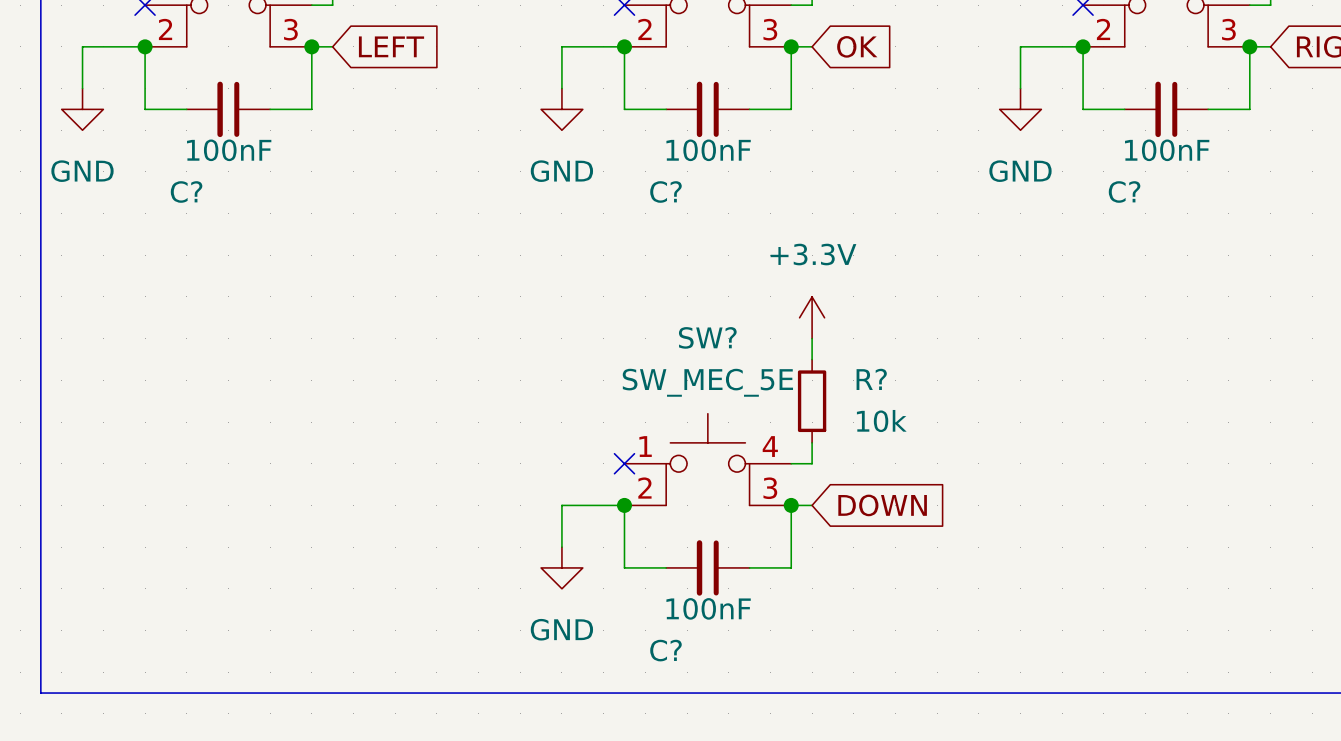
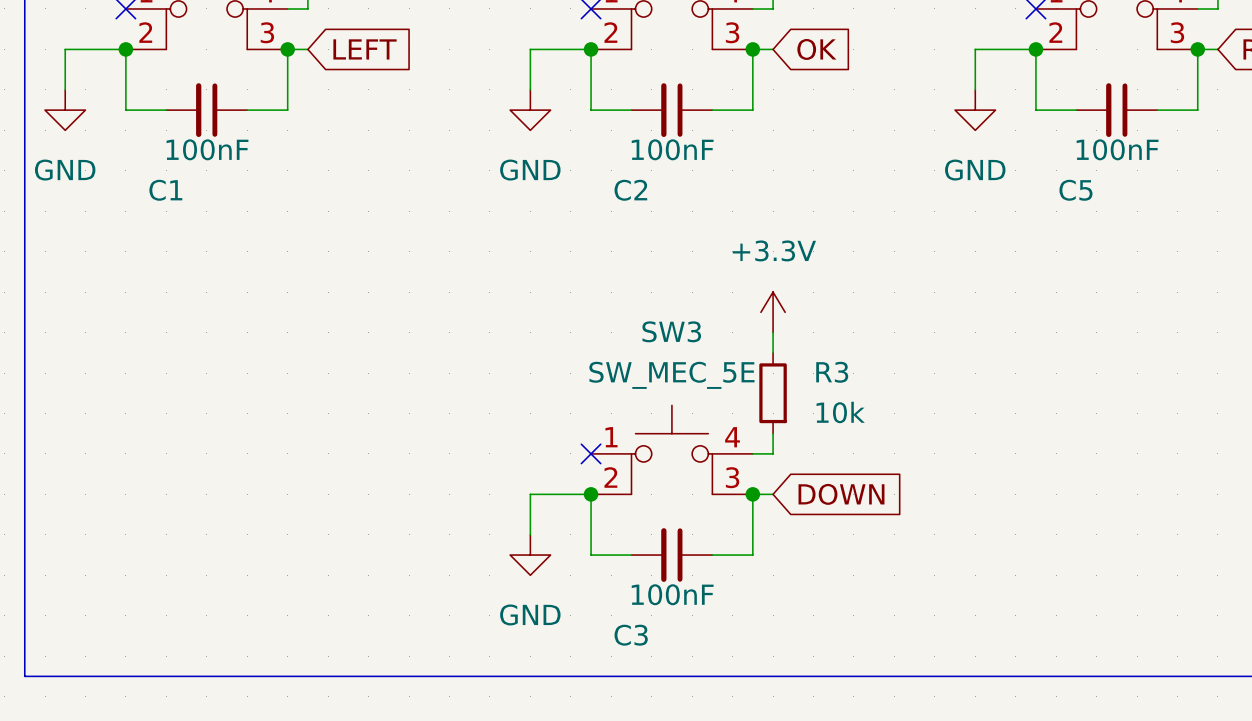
C? name: C? (186, 191) -> C1 (165, 190)
C? name: C? (665, 191) -> C2 (630, 190)
C? name: C? (1124, 191) -> C5 (1075, 190)
SW? name: SW? (707, 337) -> SW3 (671, 331)
R? name: R? (871, 379) -> R3 (832, 372)
C? name: C? (665, 650) -> C3 (631, 635)

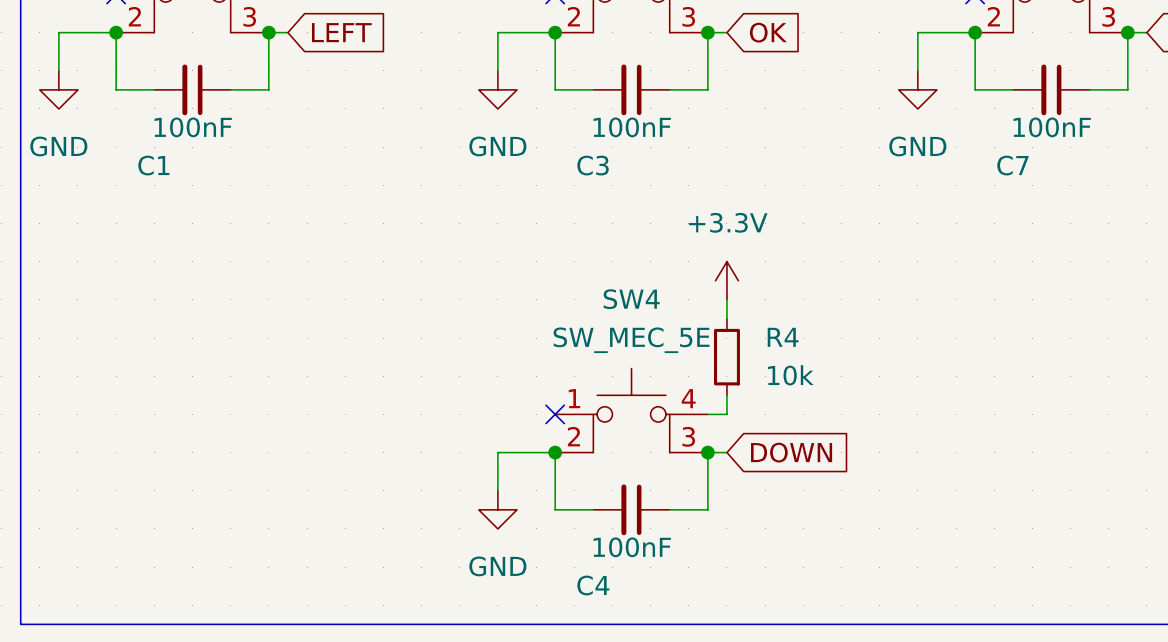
C2 name: C2 (630, 190) -> C3 (593, 165)
C5 name: C5 (1075, 190) -> C7 (1012, 165)
SW3 name: SW3 (671, 331) -> SW4 (631, 299)
R3 name: R3 (832, 372) -> R4 (783, 337)
C3 name: C3 (631, 635) -> C4 (593, 585)

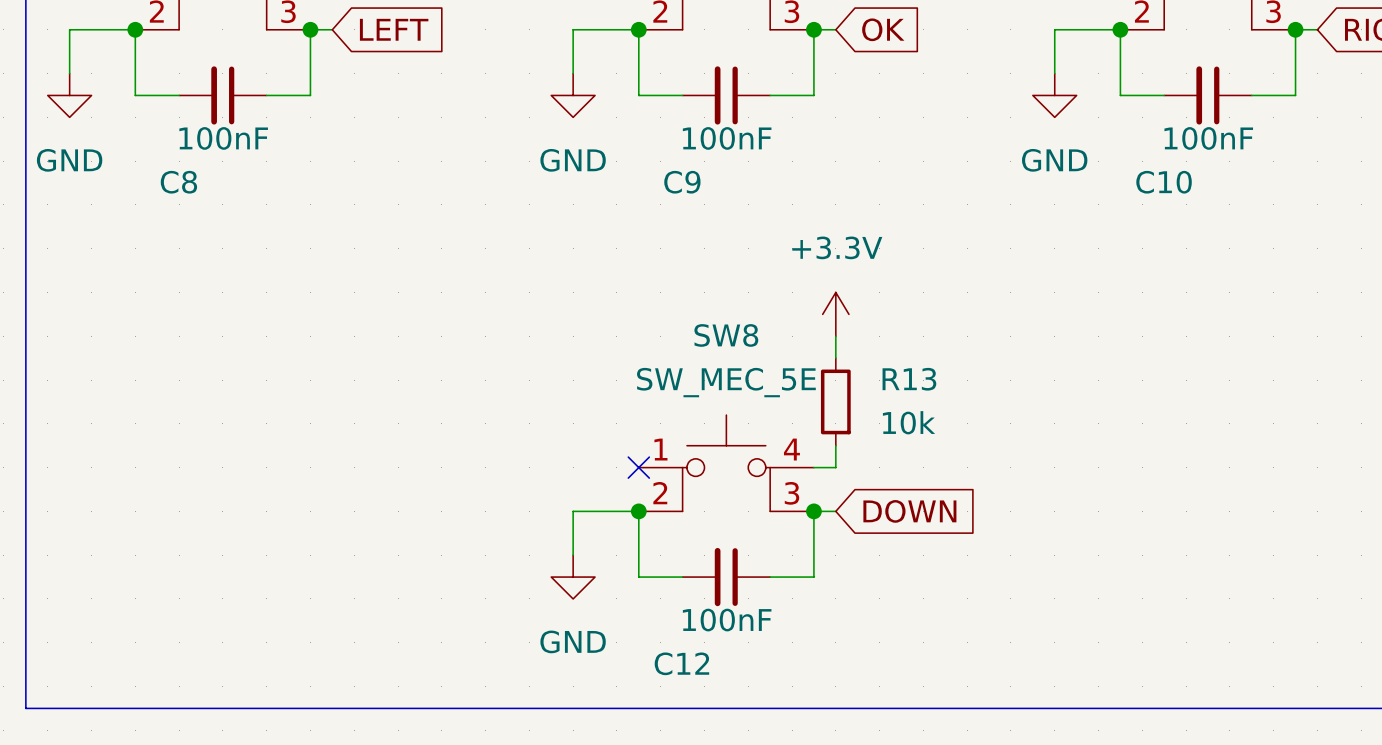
C1 name: C1 (153, 165) -> C8 (178, 182)
C3 name: C3 (593, 165) -> C9 (682, 182)
C7 name: C7 (1012, 165) -> C10 (1164, 182)
SW4 name: SW4 (631, 299) -> SW8 (726, 335)
R4 name: R4 (783, 337) -> R13 (909, 379)
C4 name: C4 (593, 585) -> C12 (681, 663)

